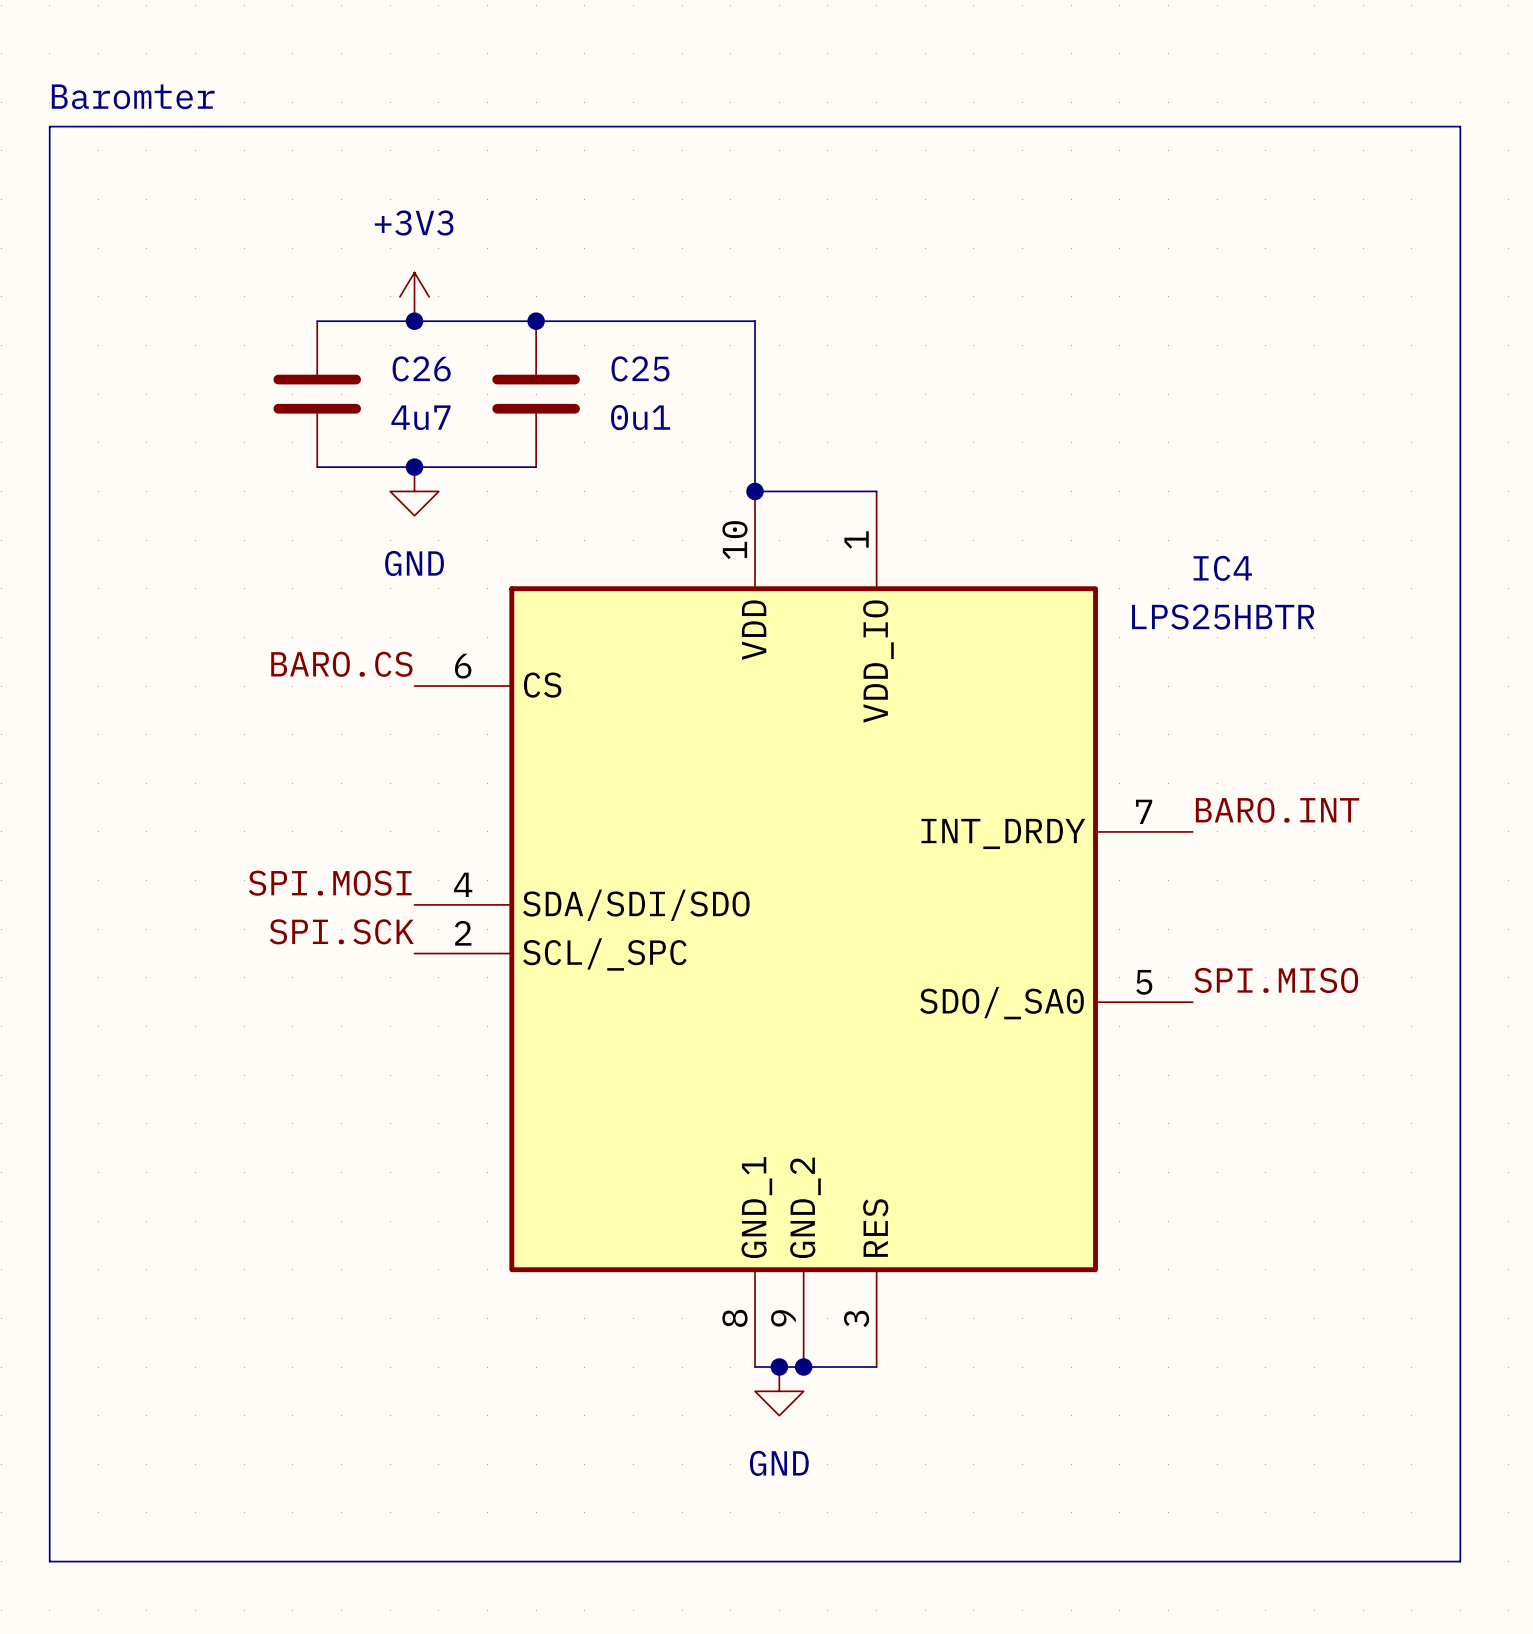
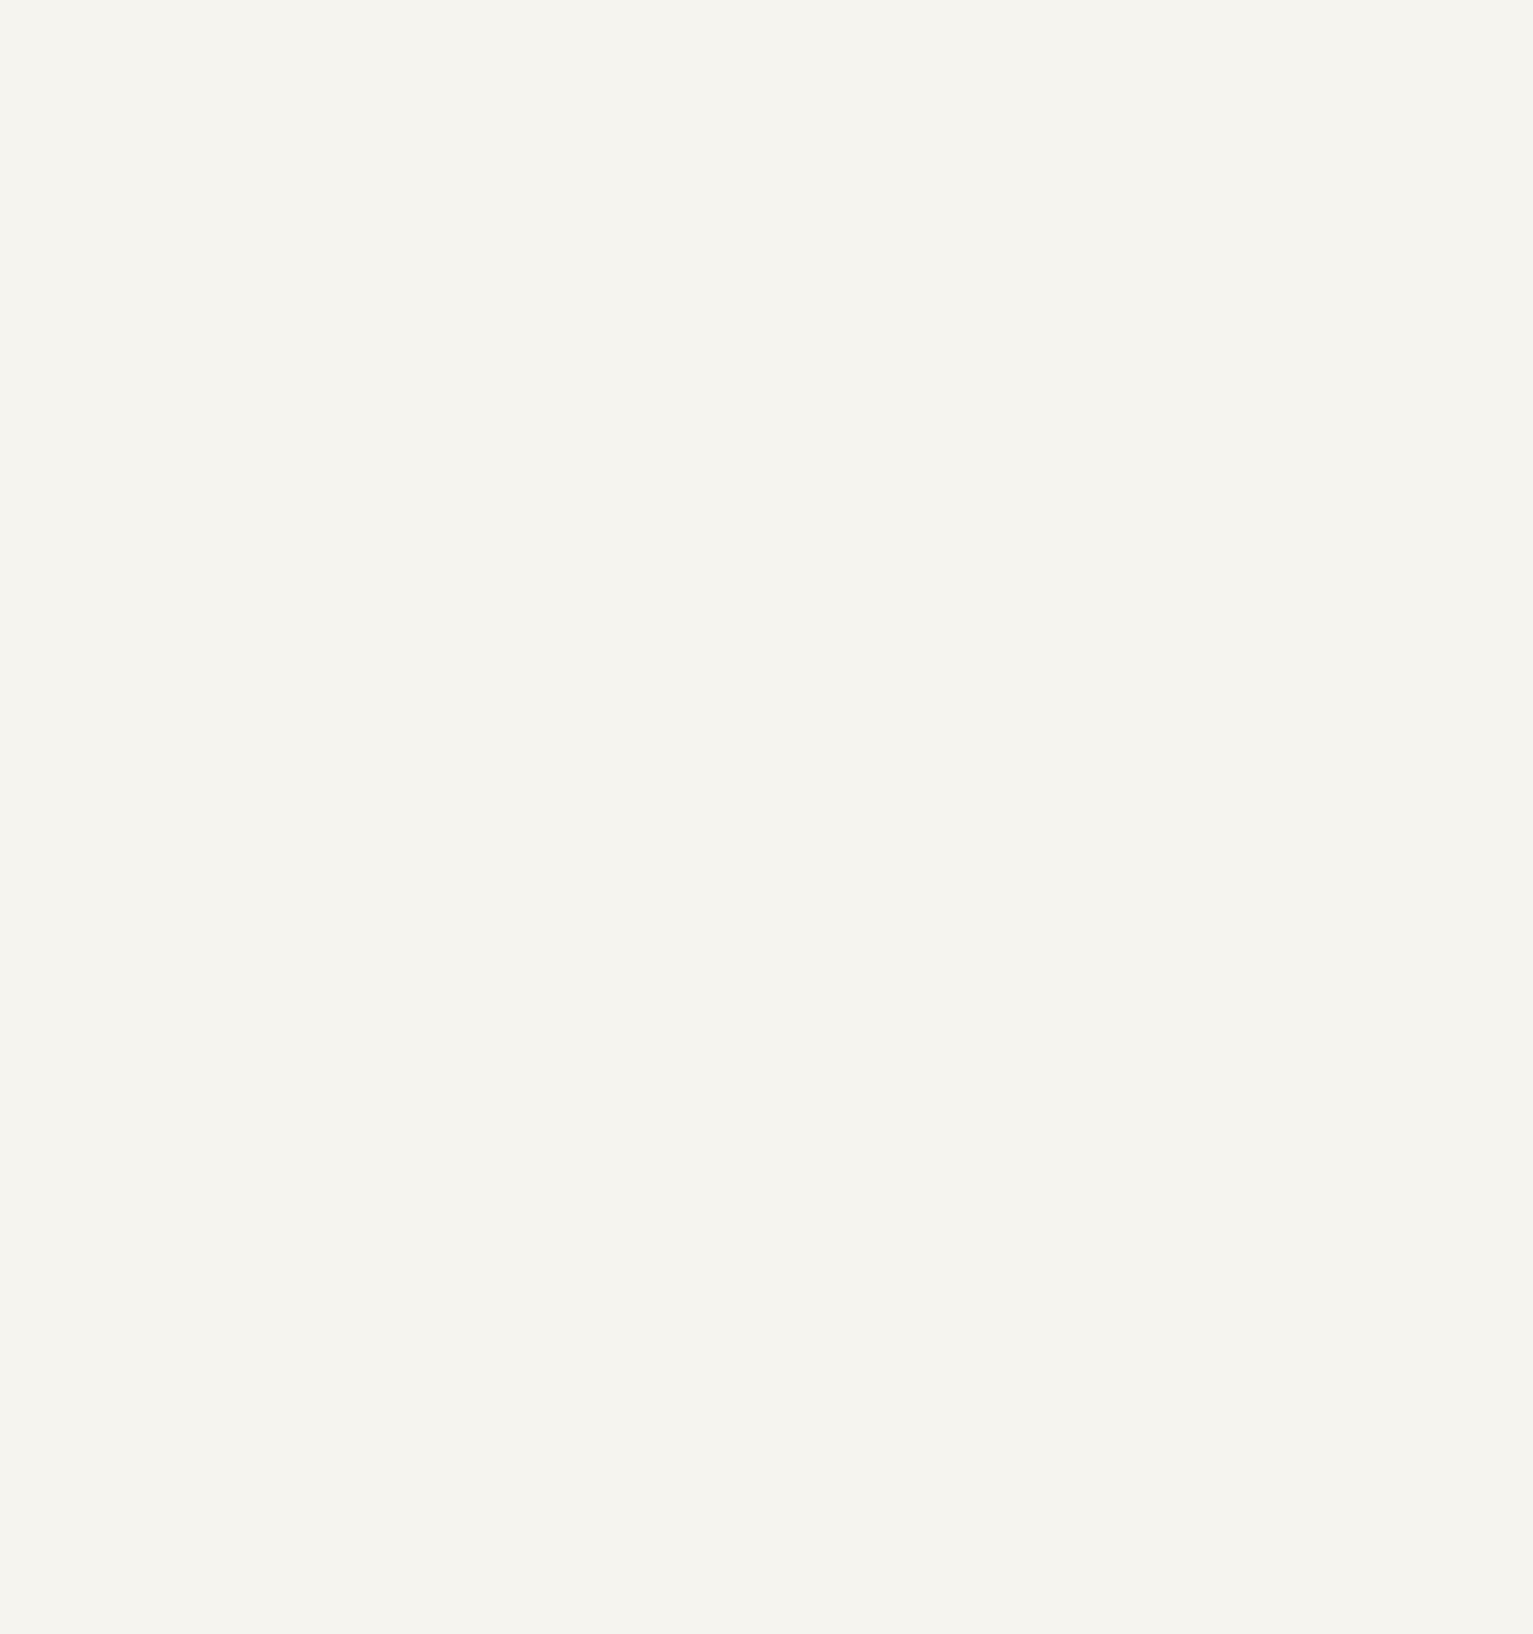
text: Baromter (133, 96) -> none
line: (49, 126) (1460, 126) (1460, 1561) (49, 1561) (49, 126) -> none
power symbol: +3V3 (414, 296) -> none
wire: (317, 321) (755, 321) (755, 491) (876, 491) -> none
junction: (414, 321) -> none
junction: (536, 321) -> none
C26: 4u7 (317, 394) -> none
C25: 0u1 (536, 394) -> none
wire: (317, 467) (536, 467) -> none
junction: (414, 467) -> none
power symbol: GND (414, 491) -> none
junction: (755, 491) -> none
label: BARO.CS (341, 664) -> none
label: BARO.INT (1277, 810) -> none
label: SPI.MOSI (330, 883) -> none
IC4: LPS25HBTR (803, 929) -> none
label: SPI.SCK (341, 931) -> none
label: SPI.MISO (1276, 980) -> none
wire: (755, 1367) (876, 1367) -> none
junction: (779, 1367) -> none
junction: (803, 1367) -> none
power symbol: GND (779, 1391) -> none

